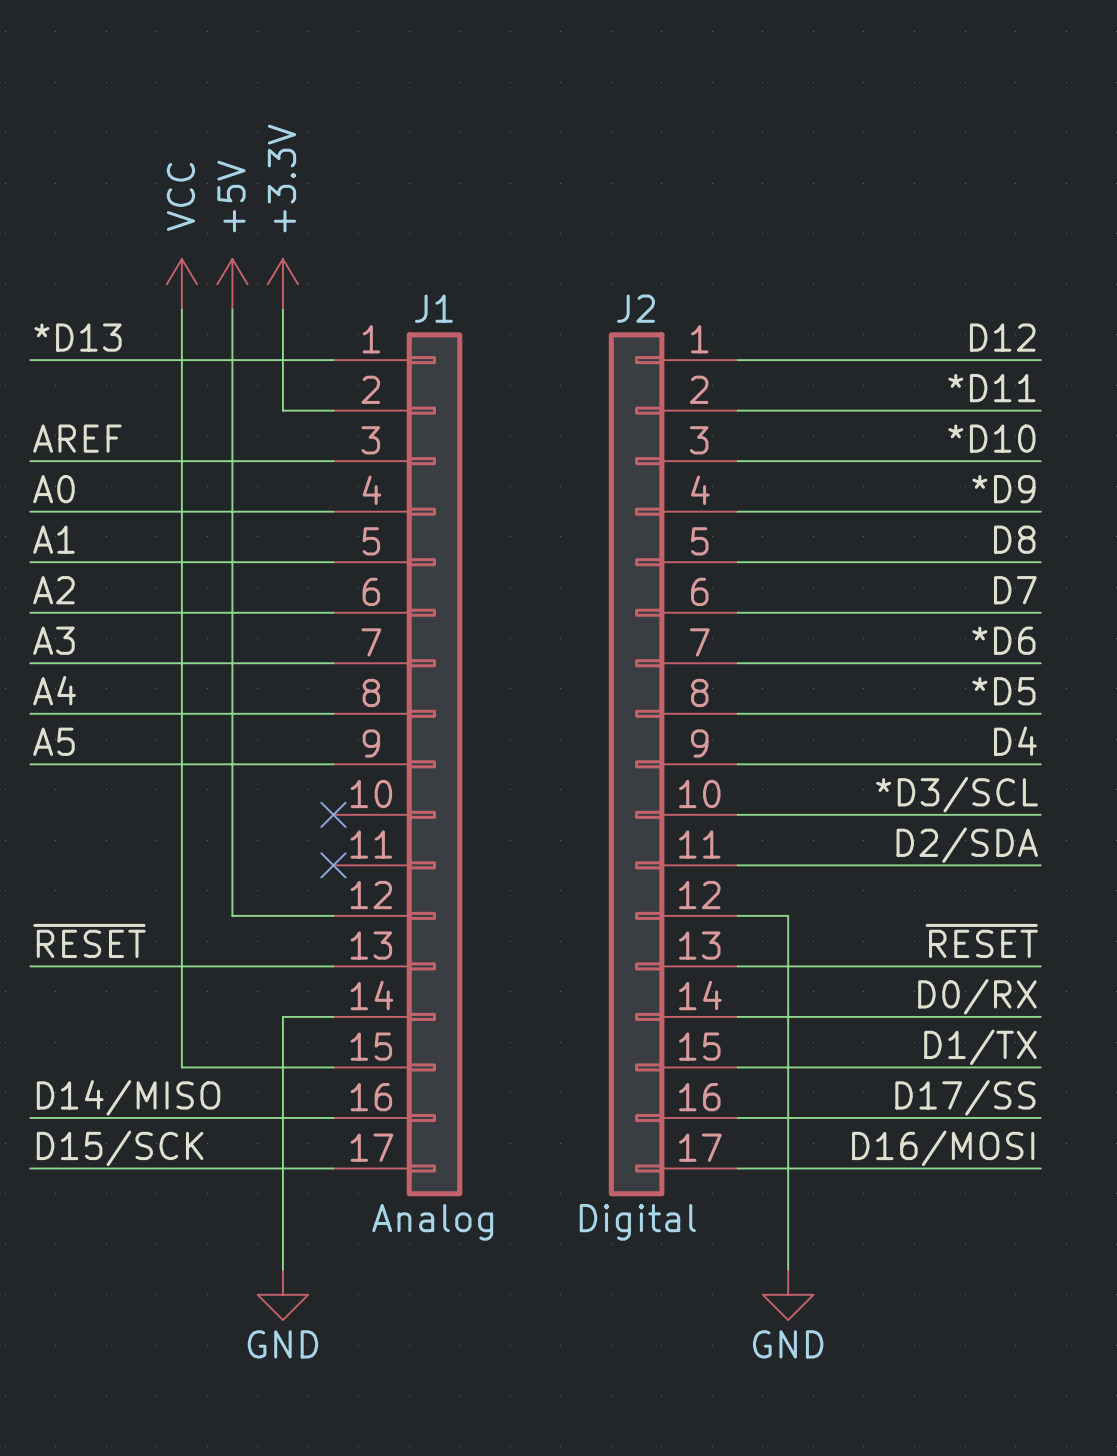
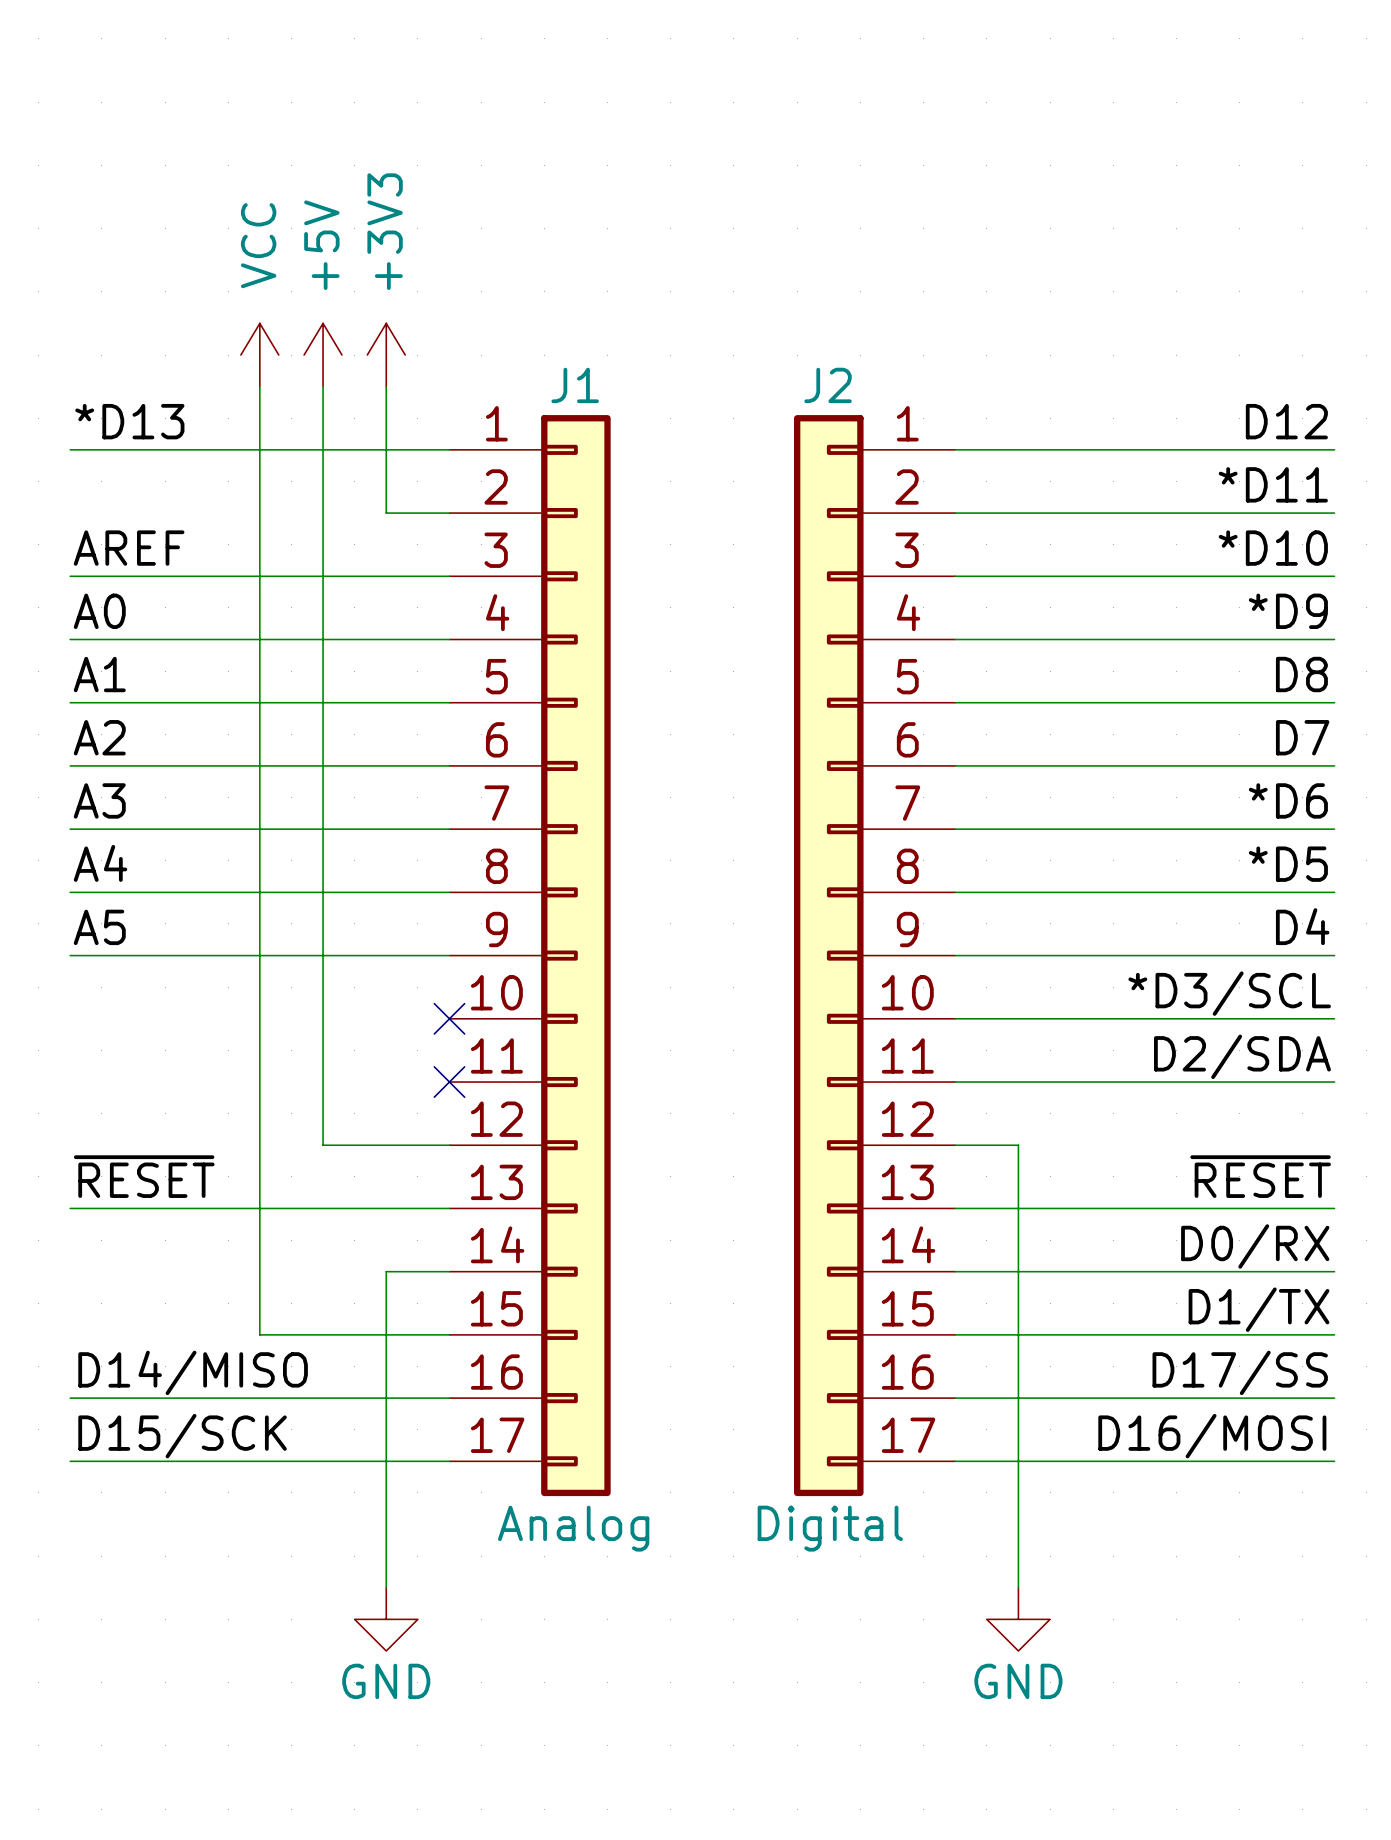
power symbol: +3.3V (282, 284) -> +3V3 (386, 355)

